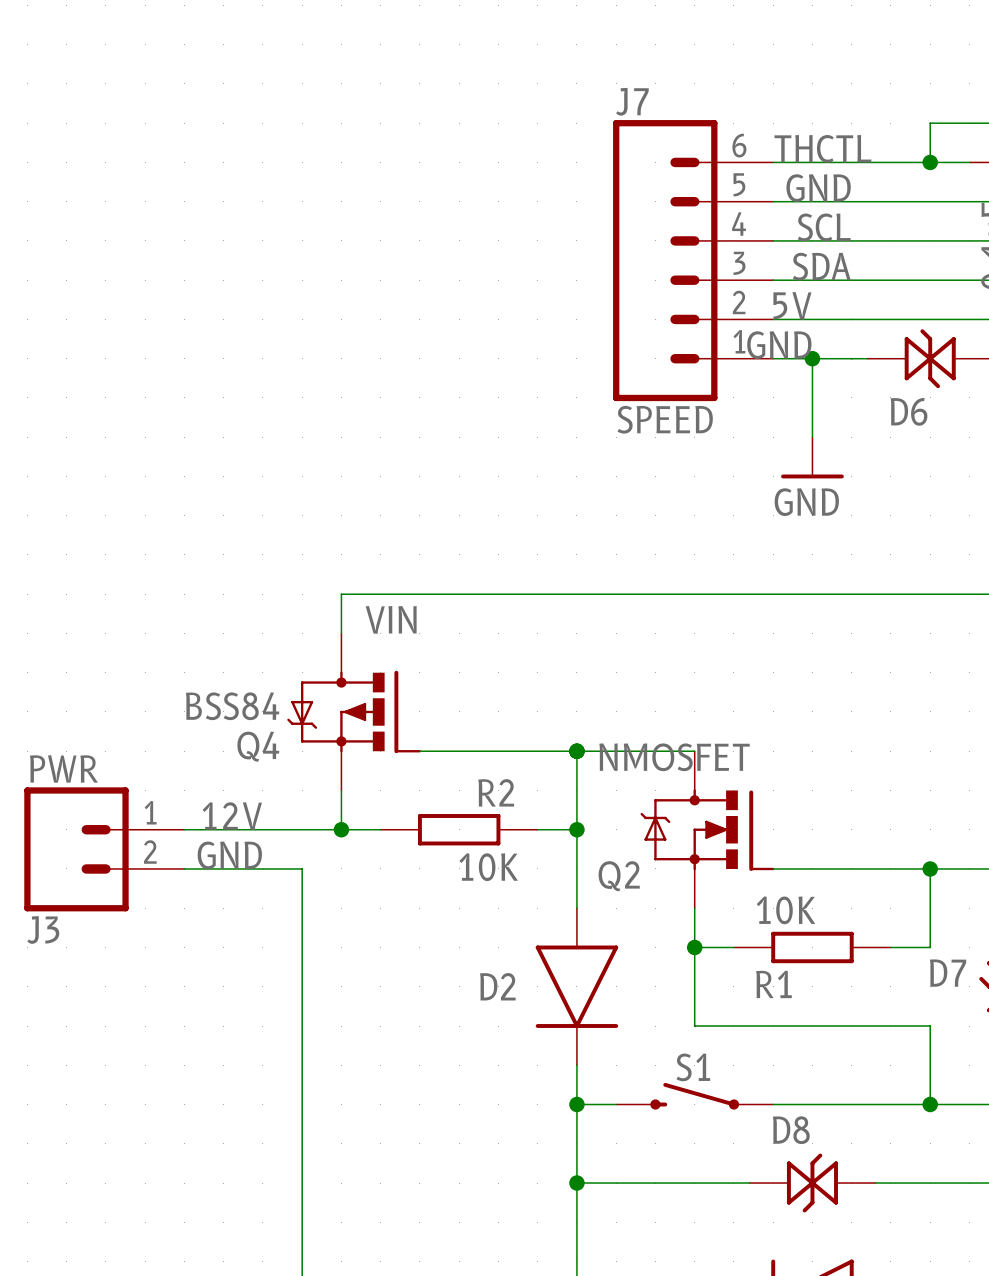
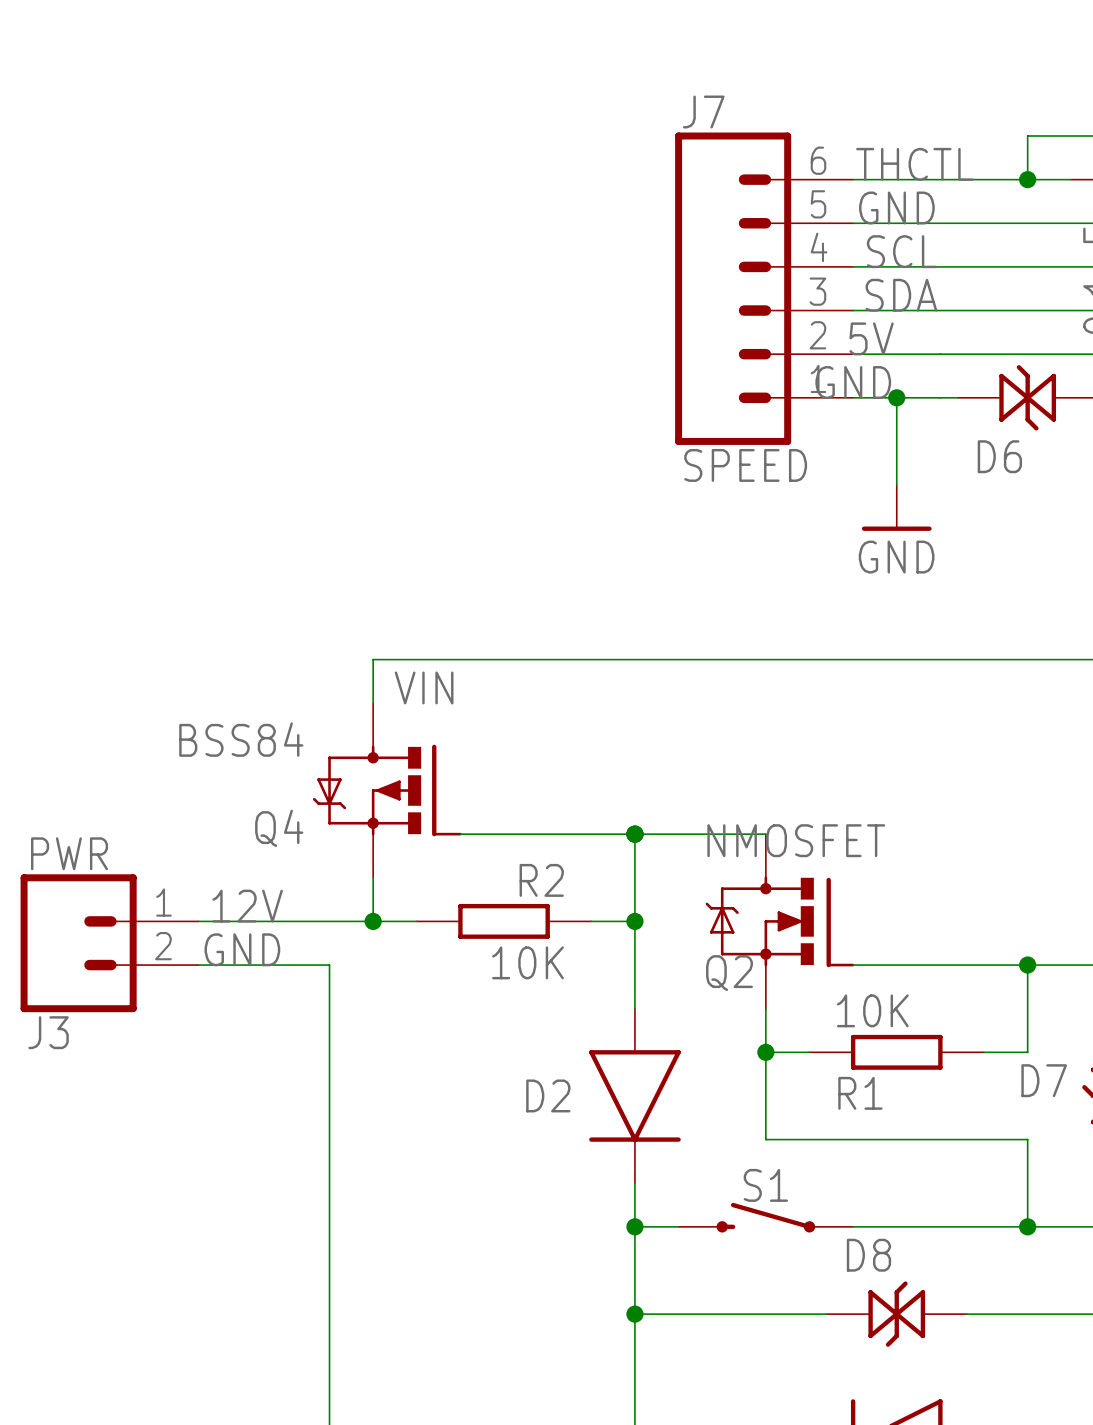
Q4 value position: BSS84 (232, 706) -> BSS84 (241, 739)
Q2 value position: NMOSFET (674, 757) -> NMOSFET (796, 840)
Q2 name position: Q2 (619, 876) -> Q2 (729, 973)

